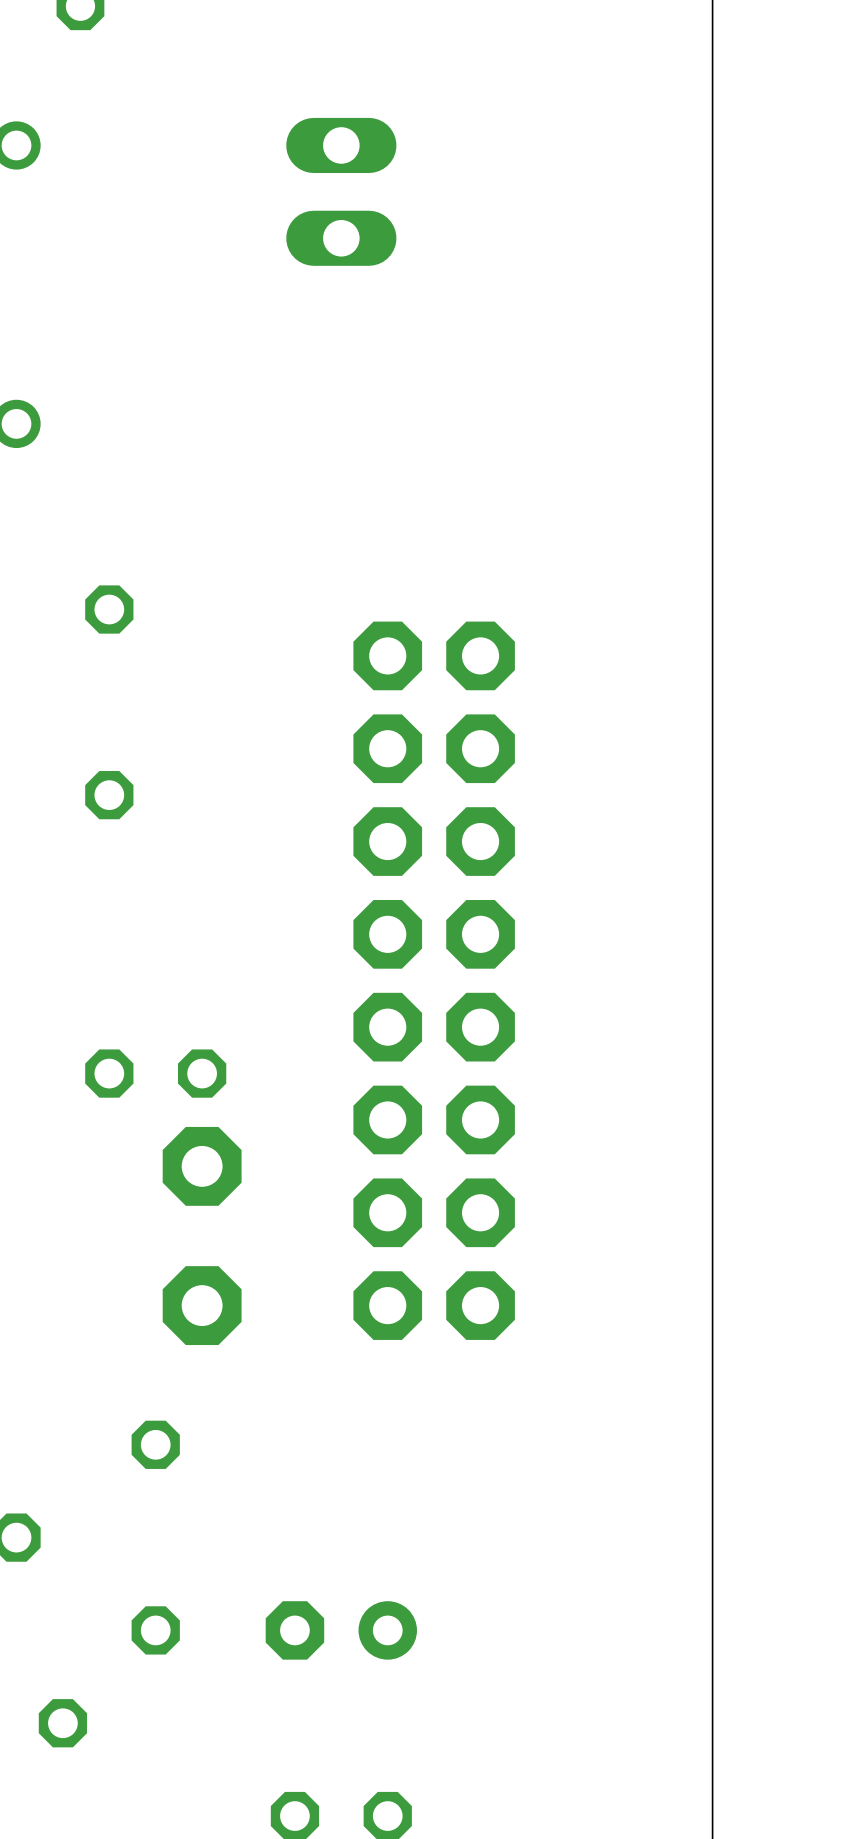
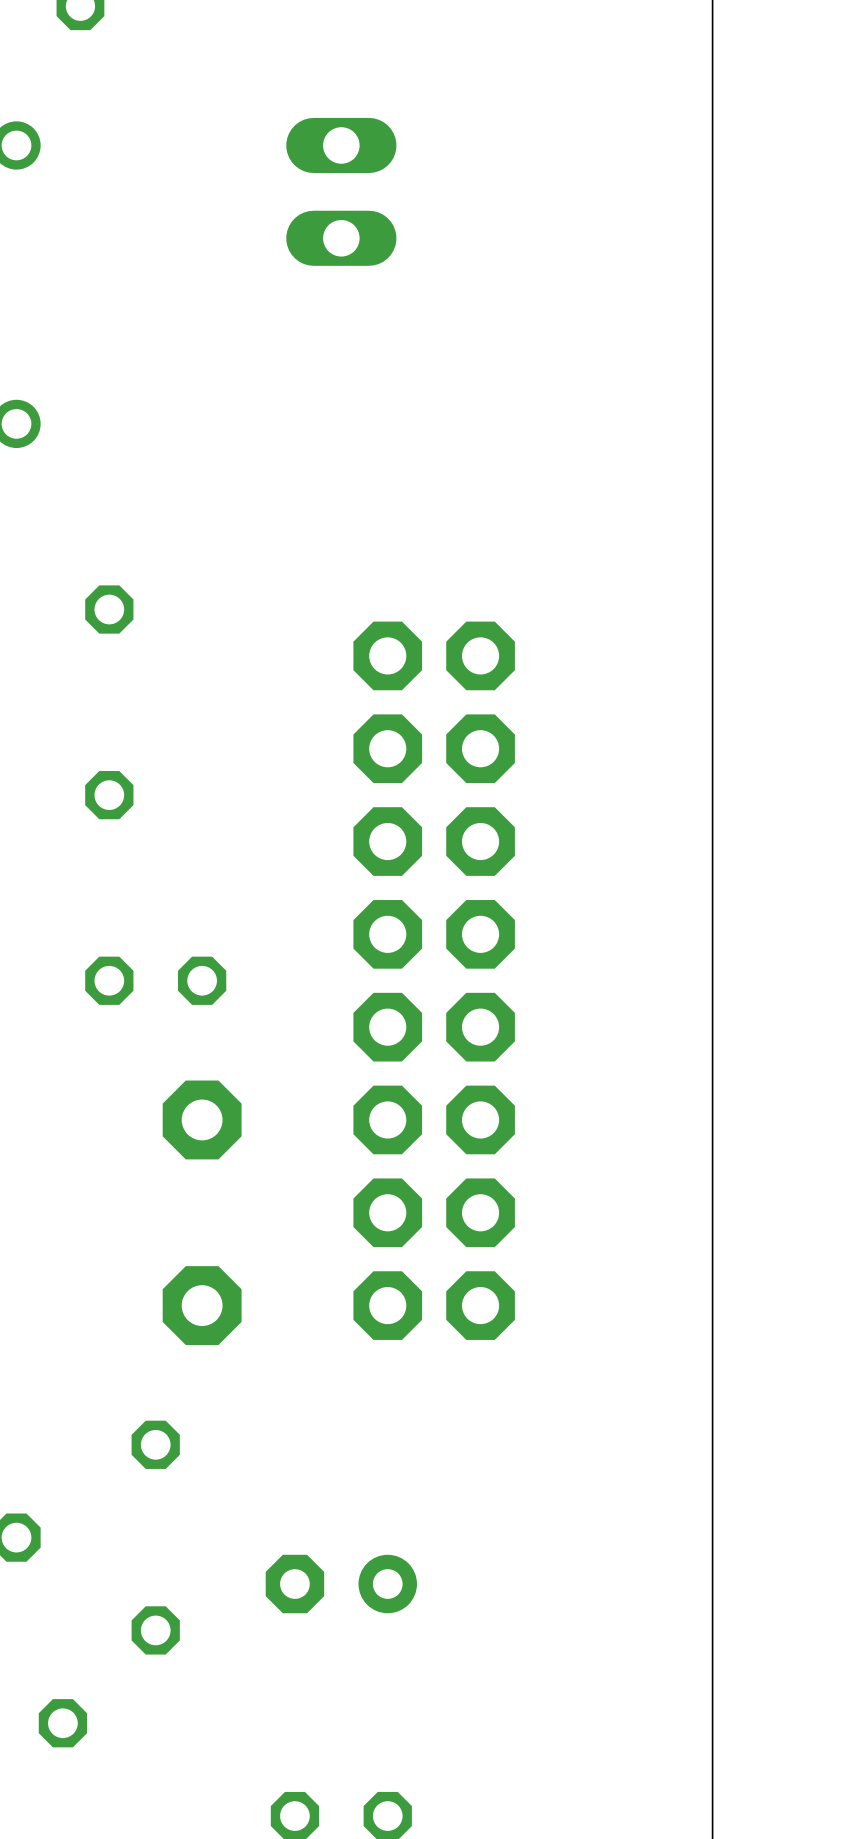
part position: (155, 1073) -> (155, 980)
part position: (202, 1166) -> (202, 1119)
part position: (341, 1630) -> (341, 1584)

